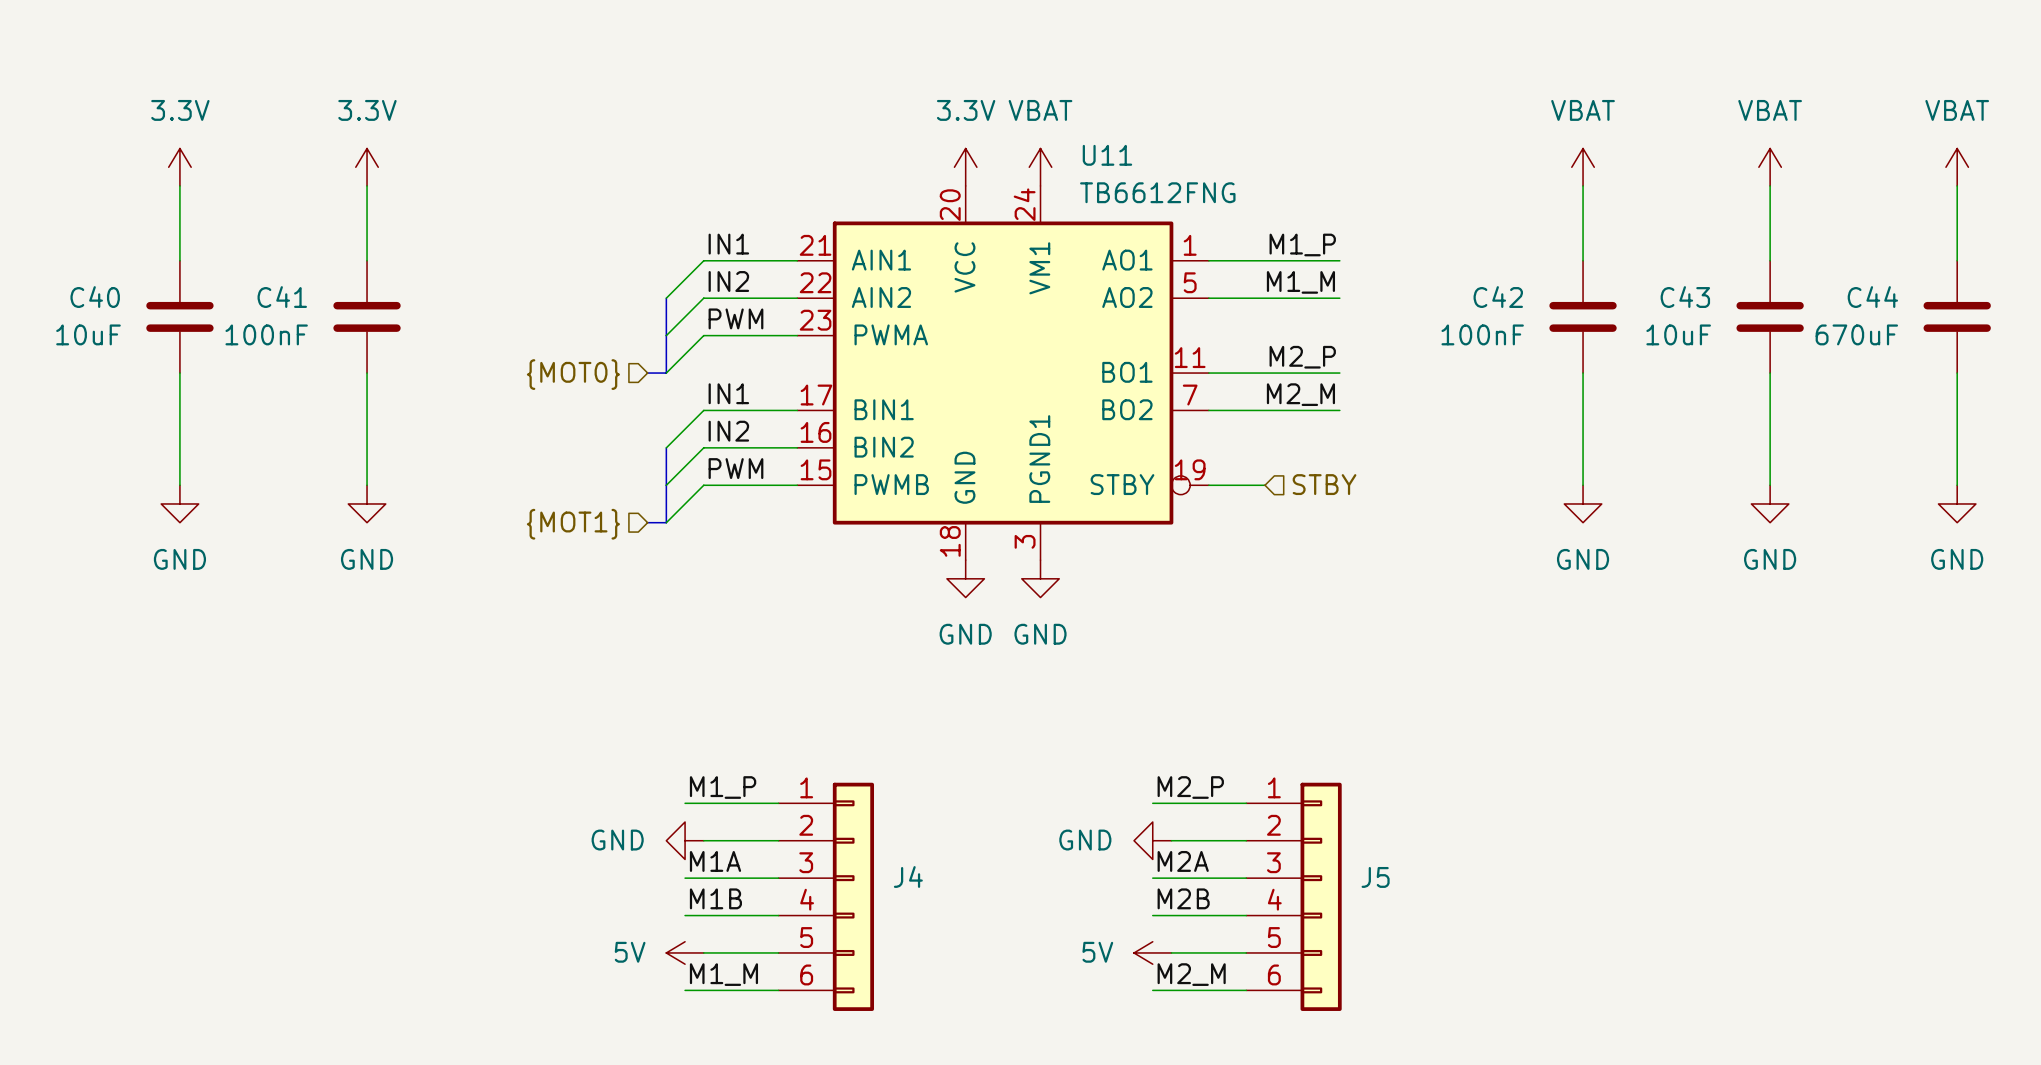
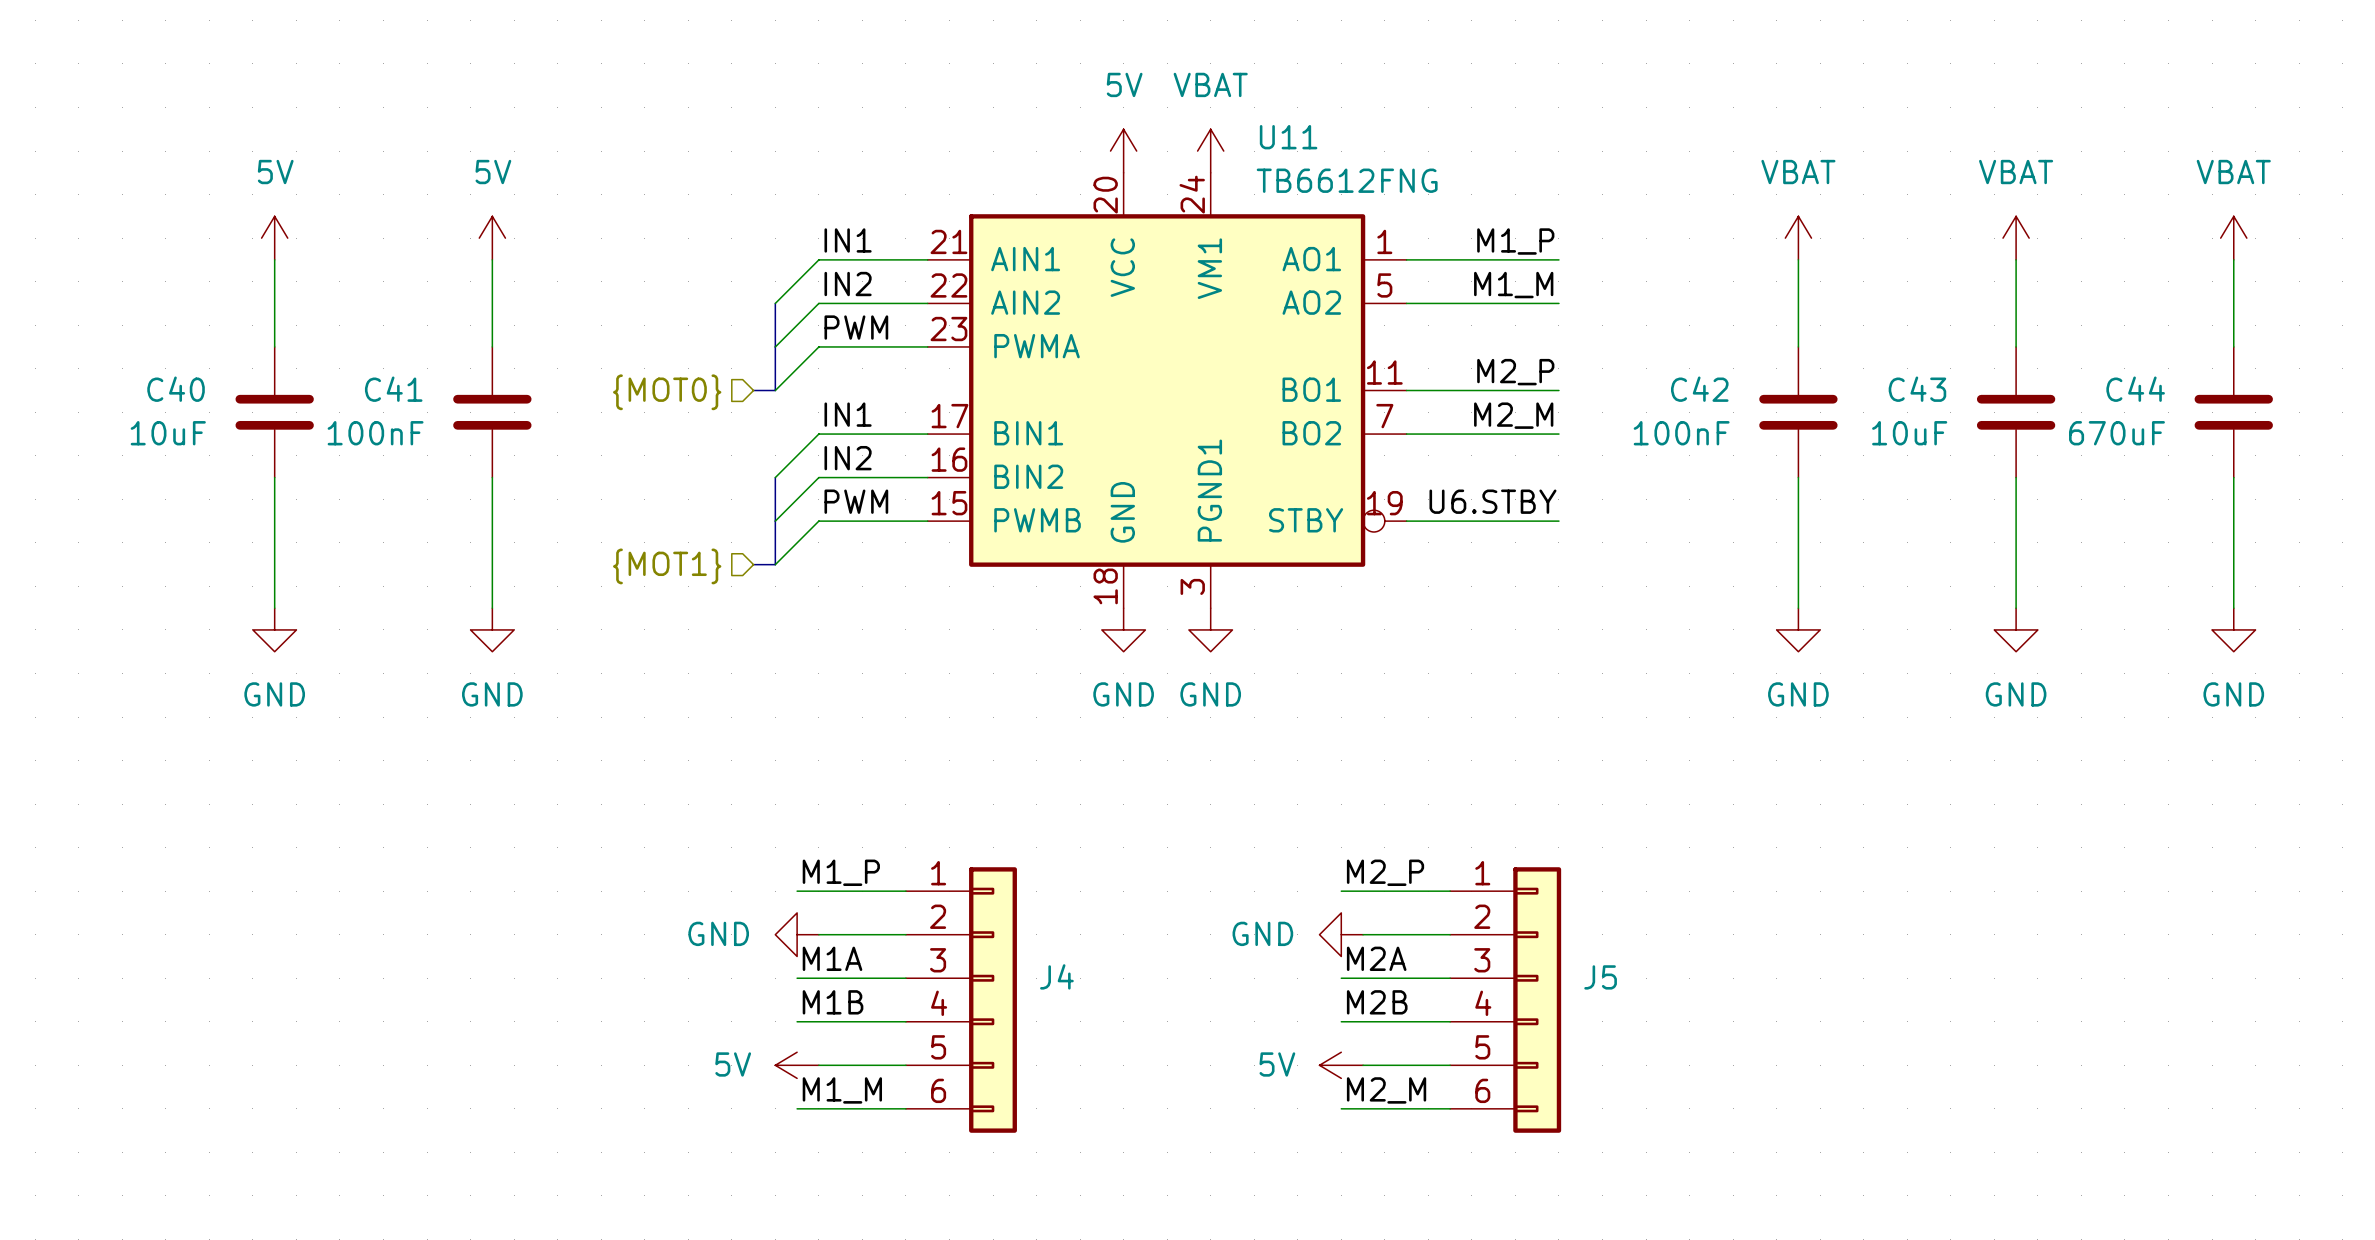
power symbol: none -> 5V (1123, 151)
power symbol: 3.3V (179, 167) -> none
power symbol: 3.3V (367, 167) -> none
power symbol: 3.3V (965, 167) -> none
power symbol position: VBAT (1040, 167) -> VBAT (1210, 151)
power symbol position: VBAT (1583, 167) -> VBAT (1798, 238)
power symbol position: VBAT (1770, 167) -> VBAT (2016, 238)
power symbol position: VBAT (1957, 167) -> VBAT (2233, 238)
wire: (179, 185) (179, 260) -> (274, 259) (274, 346)
wire: (367, 185) (367, 260) -> (492, 259) (492, 346)
wire: (1583, 185) (1583, 260) -> (1798, 259) (1798, 346)
wire: (1770, 185) (1770, 260) -> (2016, 259) (2016, 346)
wire: (1957, 185) (1957, 260) -> (2233, 259) (2233, 346)
power symbol: none -> 5V (274, 238)
power symbol: none -> 5V (492, 238)
label: none -> IN1 (848, 240)
label: none -> M1_P (1515, 241)
wire: none -> (1406, 259) (1558, 259)
label: IN1 (728, 244) -> IN2 (848, 284)
label: M1_P (1302, 244) -> M1_M (1513, 285)
bus: none -> (775, 303) (775, 346)
label: IN2 (728, 281) -> PWM (856, 327)
label: M1_M (1300, 282) -> none
wire: (1208, 298) (1339, 298) -> (1406, 390) (1558, 390)
C40 position: (179, 316) -> (274, 412)
C41 position: (367, 316) -> (492, 412)
C42 position: (1583, 316) -> (1798, 412)
C43 position: (1770, 316) -> (2016, 412)
C44 position: (1957, 316) -> (2233, 412)
label: PWM (735, 318) -> none
label: none -> M2_P (1515, 372)
bus: (666, 335) (666, 373) (647, 373) -> (775, 390) (753, 390)
wire: (797, 335) (703, 335) (666, 373) -> (927, 434) (818, 434) (775, 477)
label: none -> IN1 (848, 414)
label: M2_P (1302, 357) -> M2_M (1513, 415)
wire: (179, 373) (179, 485) -> (274, 477) (274, 608)
wire: (367, 373) (367, 485) -> (492, 477) (492, 608)
U11 position: (1003, 373) -> (1167, 390)
wire: (1583, 373) (1583, 485) -> (1798, 477) (1798, 608)
wire: (1770, 373) (1770, 485) -> (2016, 477) (2016, 608)
wire: (1957, 373) (1957, 485) -> (2233, 477) (2233, 608)
hierarchical label position: {MOT0} (573, 374) -> {MOT0} (667, 392)
label: IN1 (728, 393) -> IN2 (848, 458)
label: M2_M (1300, 394) -> none
bus: none -> (775, 477) (775, 521)
wire: (1208, 410) (1339, 410) -> (1406, 521) (1558, 521)
label: IN2 (728, 431) -> PWM (856, 501)
label: none -> U6.STBY (1492, 501)
label: PWM (735, 468) -> none
hierarchical label: STBY (1324, 484) -> none
bus: (666, 485) (666, 522) (647, 522) -> (775, 564) (753, 564)
wire: (797, 485) (703, 485) (666, 522) -> (927, 259) (818, 259) (775, 303)
wire: (1208, 485) (1265, 485) -> none
power symbol position: GND (179, 503) -> GND (274, 629)
power symbol position: GND (367, 503) -> GND (492, 629)
power symbol position: GND (1583, 503) -> GND (1798, 629)
power symbol position: GND (1770, 503) -> GND (2016, 629)
power symbol position: GND (1957, 503) -> GND (2233, 629)
hierarchical label position: {MOT1} (573, 524) -> {MOT1} (667, 566)
power symbol position: GND (965, 578) -> GND (1123, 629)
power symbol position: GND (1040, 578) -> GND (1210, 629)
label position: M1_P (723, 787) -> M1_P (841, 872)
label position: M2_P (1190, 787) -> M2_P (1385, 872)
label: none -> M1A (832, 958)
label: none -> M2A (1376, 958)
power symbol position: GND (685, 840) -> GND (797, 934)
power symbol position: GND (1152, 840) -> GND (1341, 934)
label: M1A (715, 861) -> M1B (833, 1002)
label: M2A (1183, 861) -> M2B (1377, 1002)
J4 position: (826, 896) -> (961, 1000)
J5 position: (1293, 896) -> (1505, 1000)
label: M1B (715, 898) -> none
label: M2B (1183, 898) -> none
power symbol position: 5V (685, 952) -> 5V (797, 1065)
power symbol position: 5V (1152, 952) -> 5V (1341, 1065)
label position: M1_M (723, 974) -> M1_M (842, 1090)
label position: M2_M (1191, 974) -> M2_M (1386, 1090)
wire: (685, 990) (778, 990) -> (797, 891) (905, 891)
wire: (1152, 990) (1246, 990) -> (1341, 891) (1450, 891)

